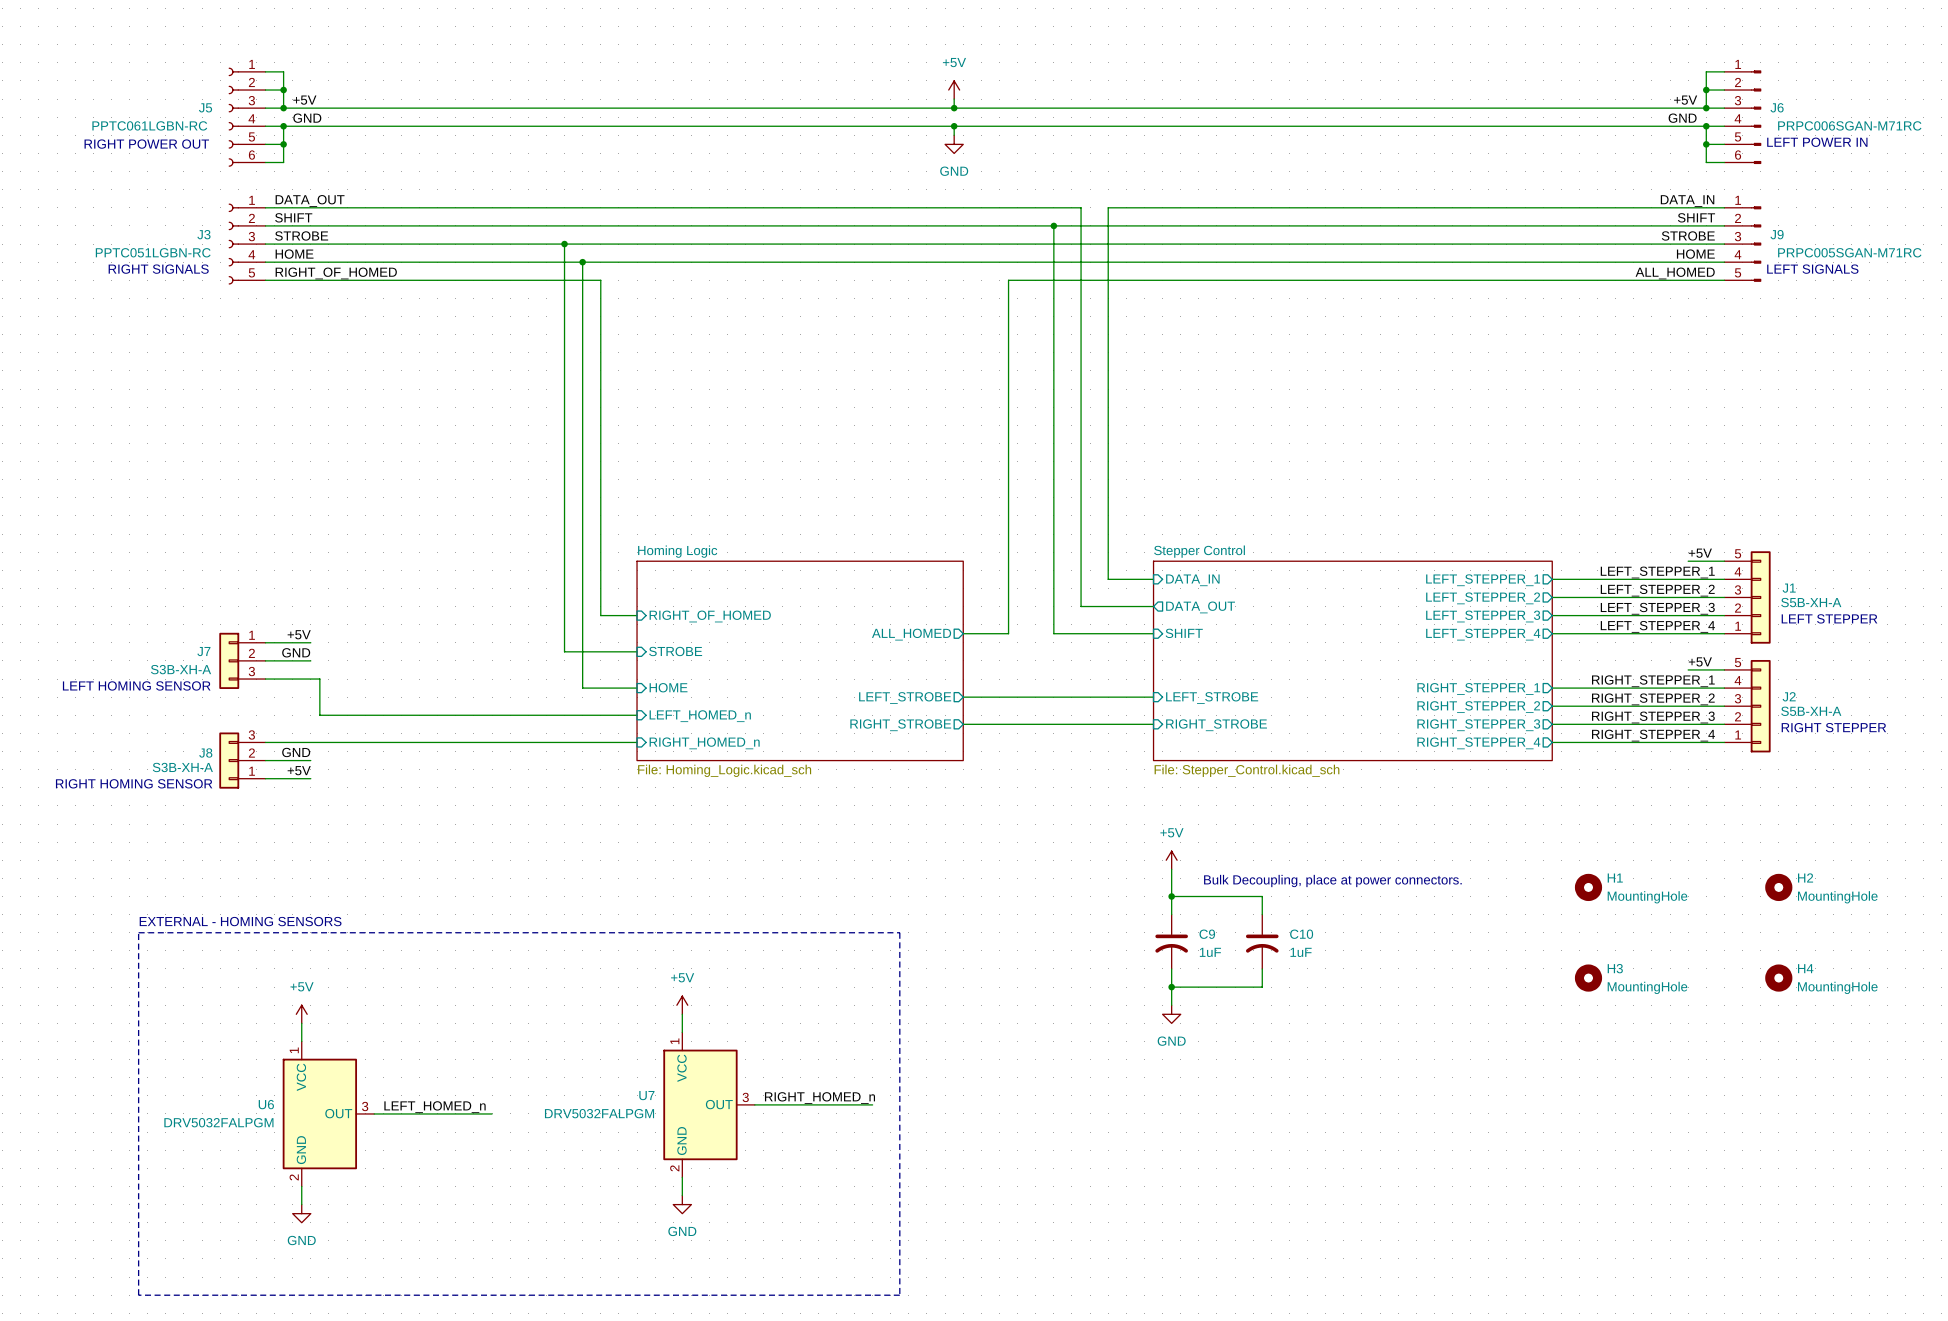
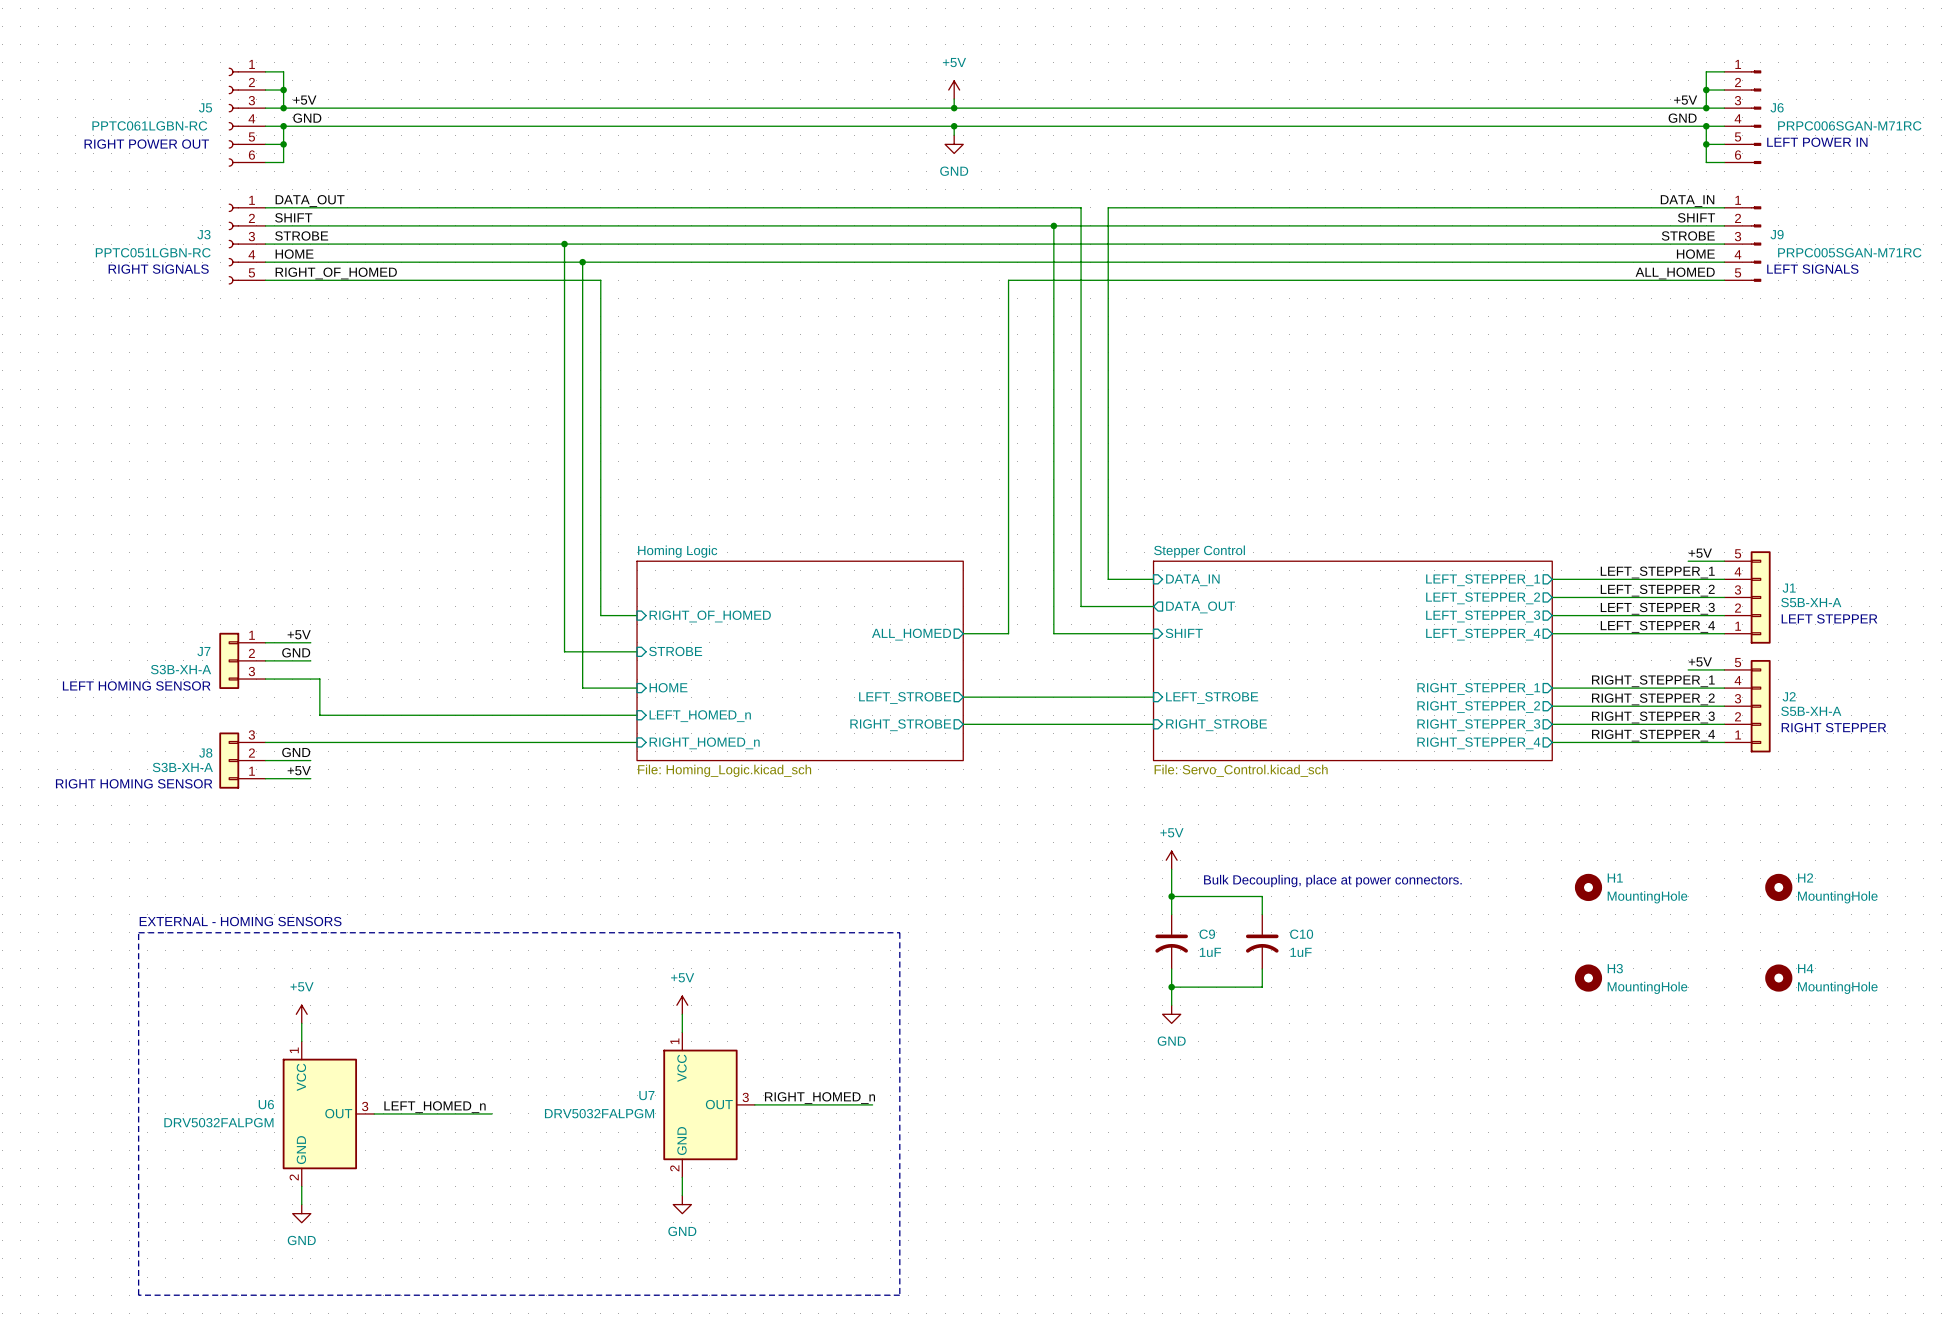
sheet Stepper Control value: File: Stepper_Control.kicad_sch (1246, 770) -> File: Servo_Control.kicad_sch (1241, 770)

